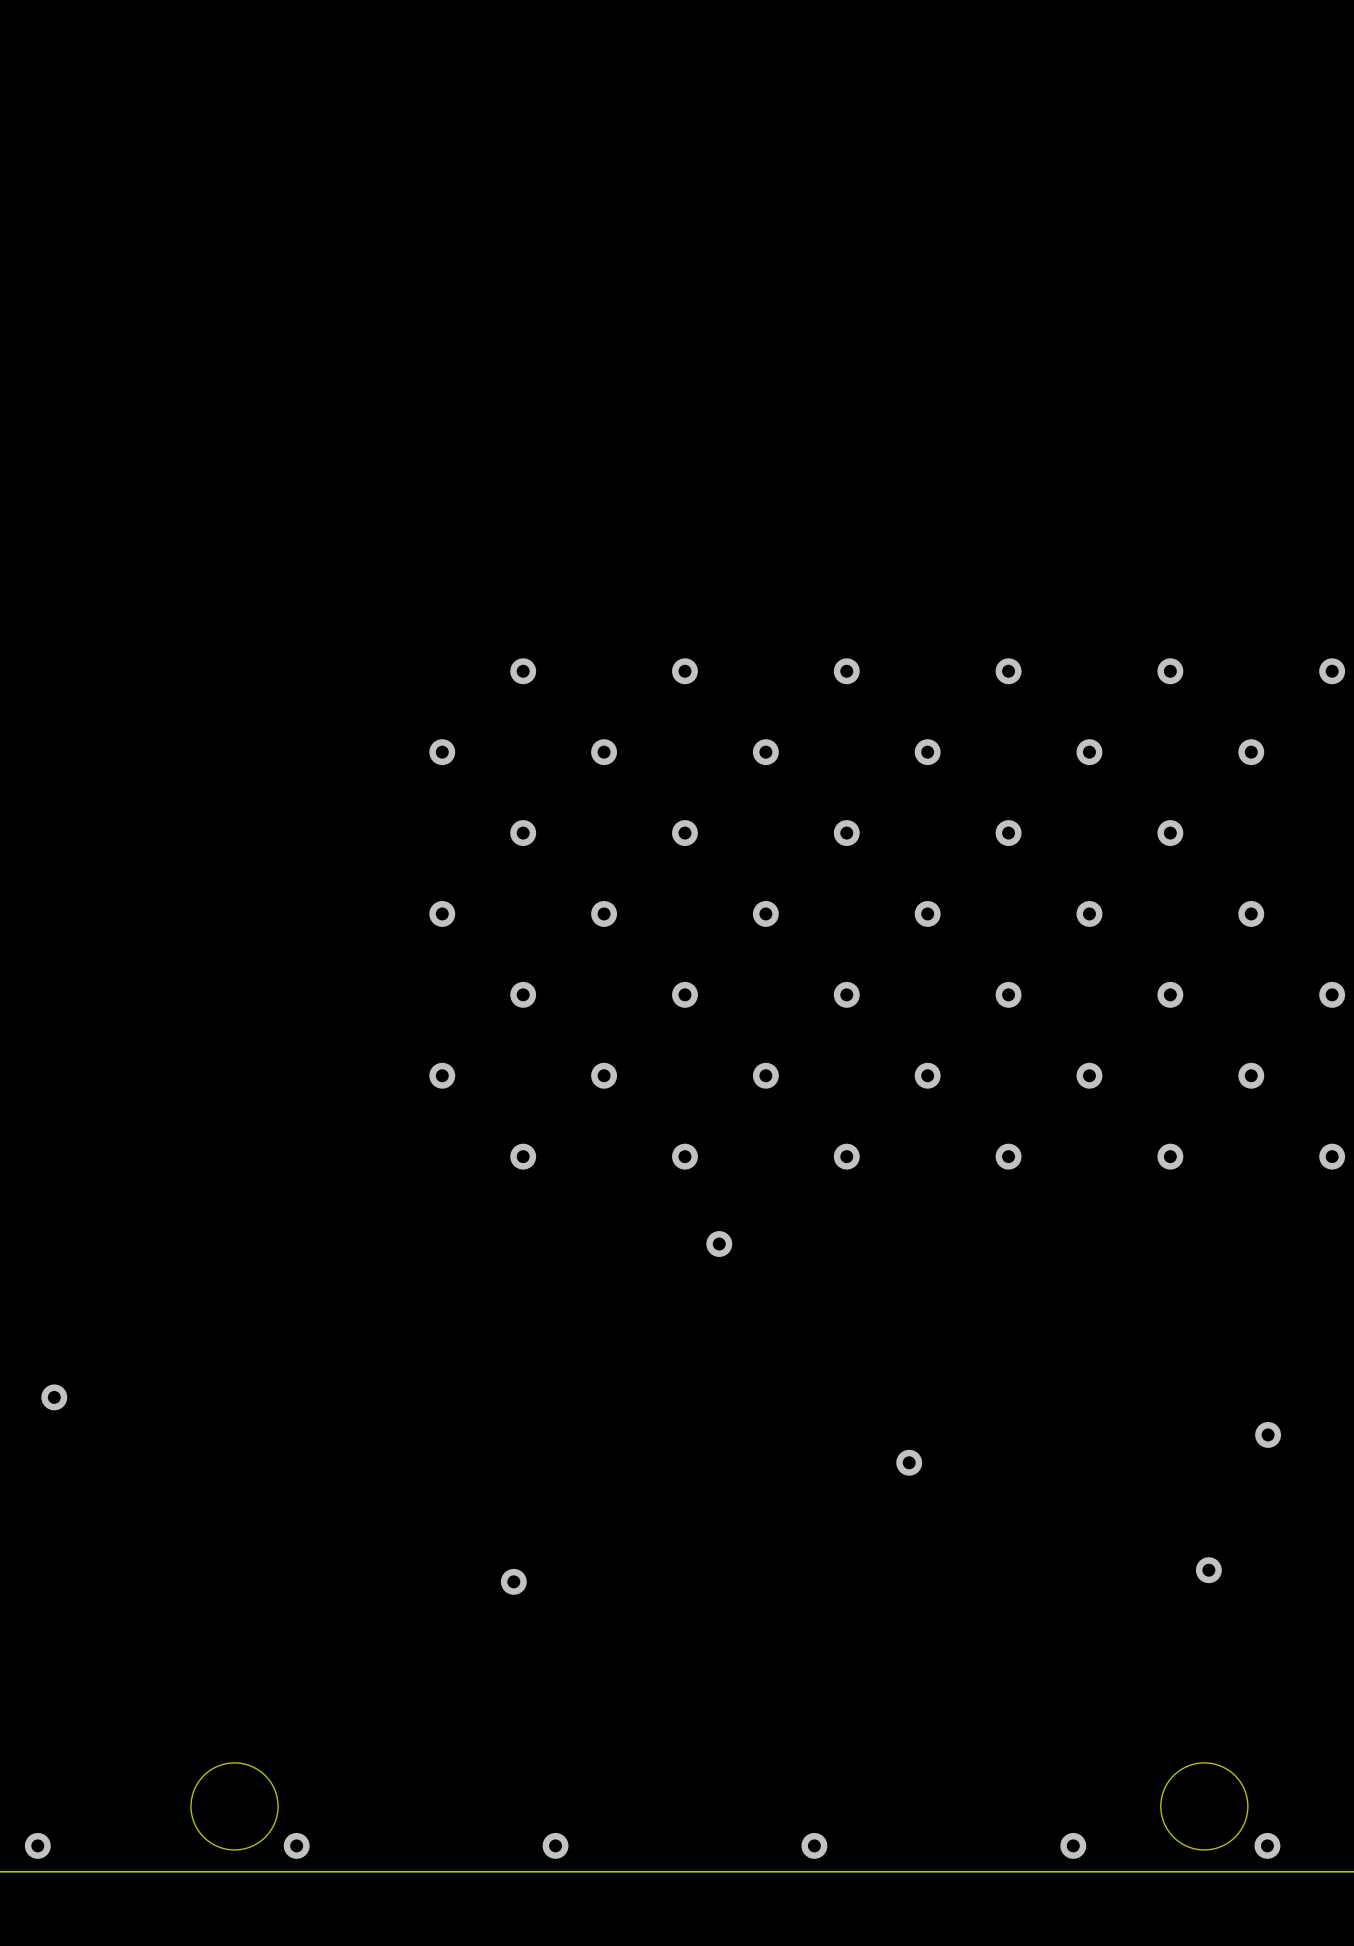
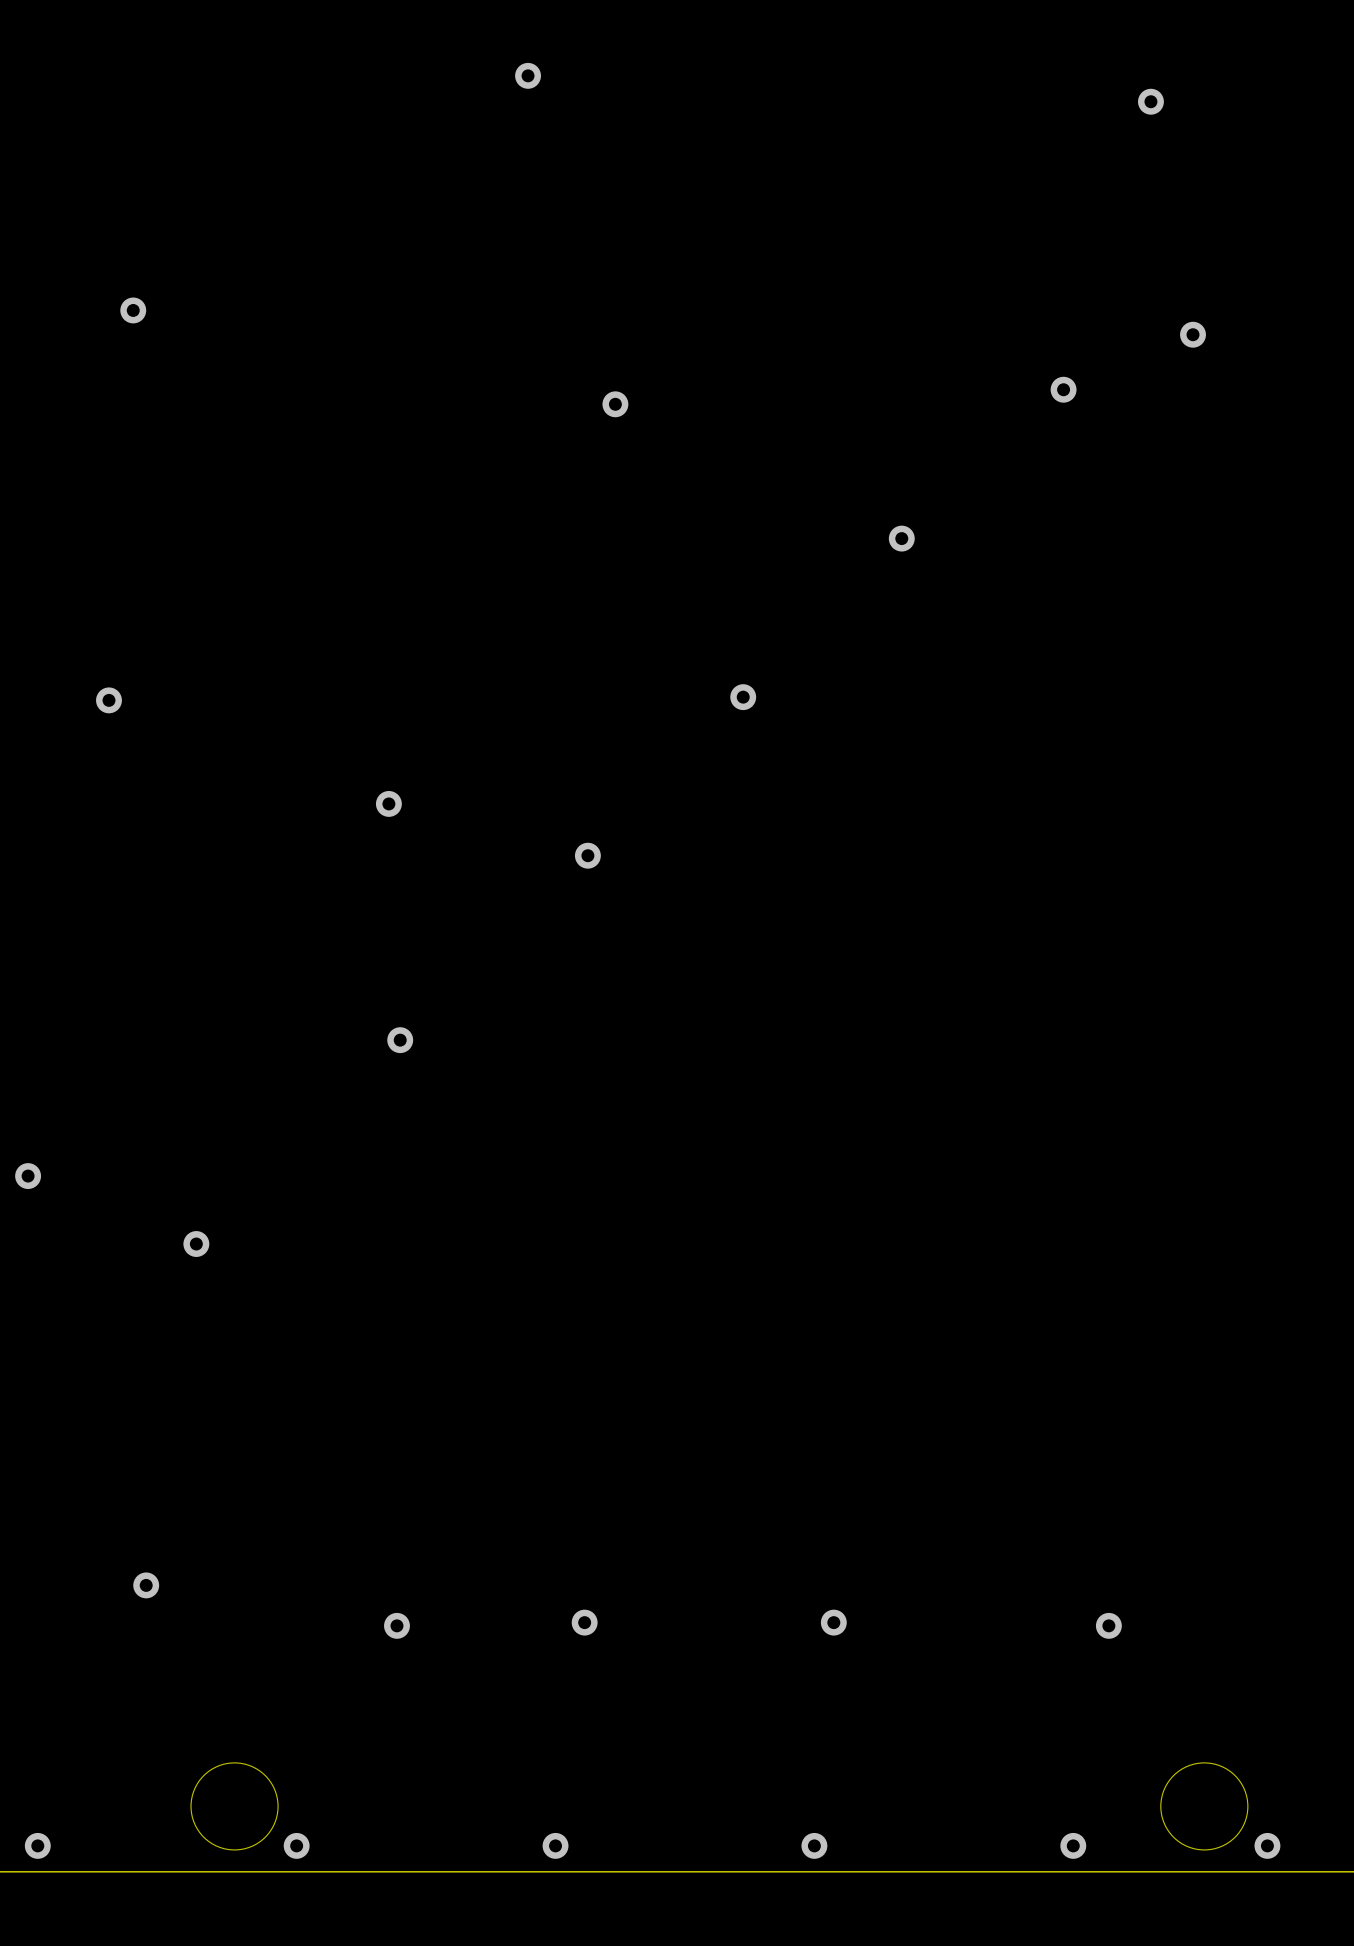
via: none -> (528, 75)
via: none -> (1150, 101)
via: none -> (133, 310)
via: none -> (1193, 334)
via: none -> (1063, 389)
via: none -> (615, 404)
via: none -> (901, 538)
via: (523, 671) -> none
via: (684, 671) -> none
via: (846, 671) -> none
via: (1008, 671) -> none
via: (1170, 671) -> none
via: (1332, 671) -> none
via: none -> (743, 697)
via: none -> (108, 700)
via: (442, 752) -> none
via: (604, 752) -> none
via: (765, 752) -> none
via: (927, 752) -> none
via: (1089, 752) -> none
via: (1251, 752) -> none
via: none -> (388, 803)
via: (523, 833) -> none
via: (684, 833) -> none
via: (846, 833) -> none
via: (1008, 833) -> none
via: (1170, 833) -> none
via: none -> (587, 855)
via: (442, 913) -> none
via: (604, 913) -> none
via: (765, 913) -> none
via: (927, 913) -> none
via: (1089, 913) -> none
via: (1251, 913) -> none
via: (523, 994) -> none
via: (684, 994) -> none
via: (846, 994) -> none
via: (1008, 994) -> none
via: (1170, 994) -> none
via: (1332, 994) -> none
via position: (442, 1075) -> (400, 1040)
via: (604, 1075) -> none
via: (765, 1075) -> none
via: (927, 1075) -> none
via: (1089, 1075) -> none
via: (1251, 1075) -> none
via: (523, 1156) -> none
via: (684, 1156) -> none
via: (846, 1156) -> none
via: (1008, 1156) -> none
via: (1170, 1156) -> none
via: (1332, 1156) -> none
via: none -> (28, 1176)
via: none -> (196, 1244)
via: (719, 1244) -> none
via: (54, 1397) -> none
via: (1268, 1434) -> none
via: (909, 1462) -> none
via: (1208, 1570) -> none
via: (513, 1581) -> none
via: none -> (146, 1585)
via: none -> (584, 1622)
via: none -> (833, 1622)
via: none -> (396, 1625)
via: none -> (1108, 1625)

